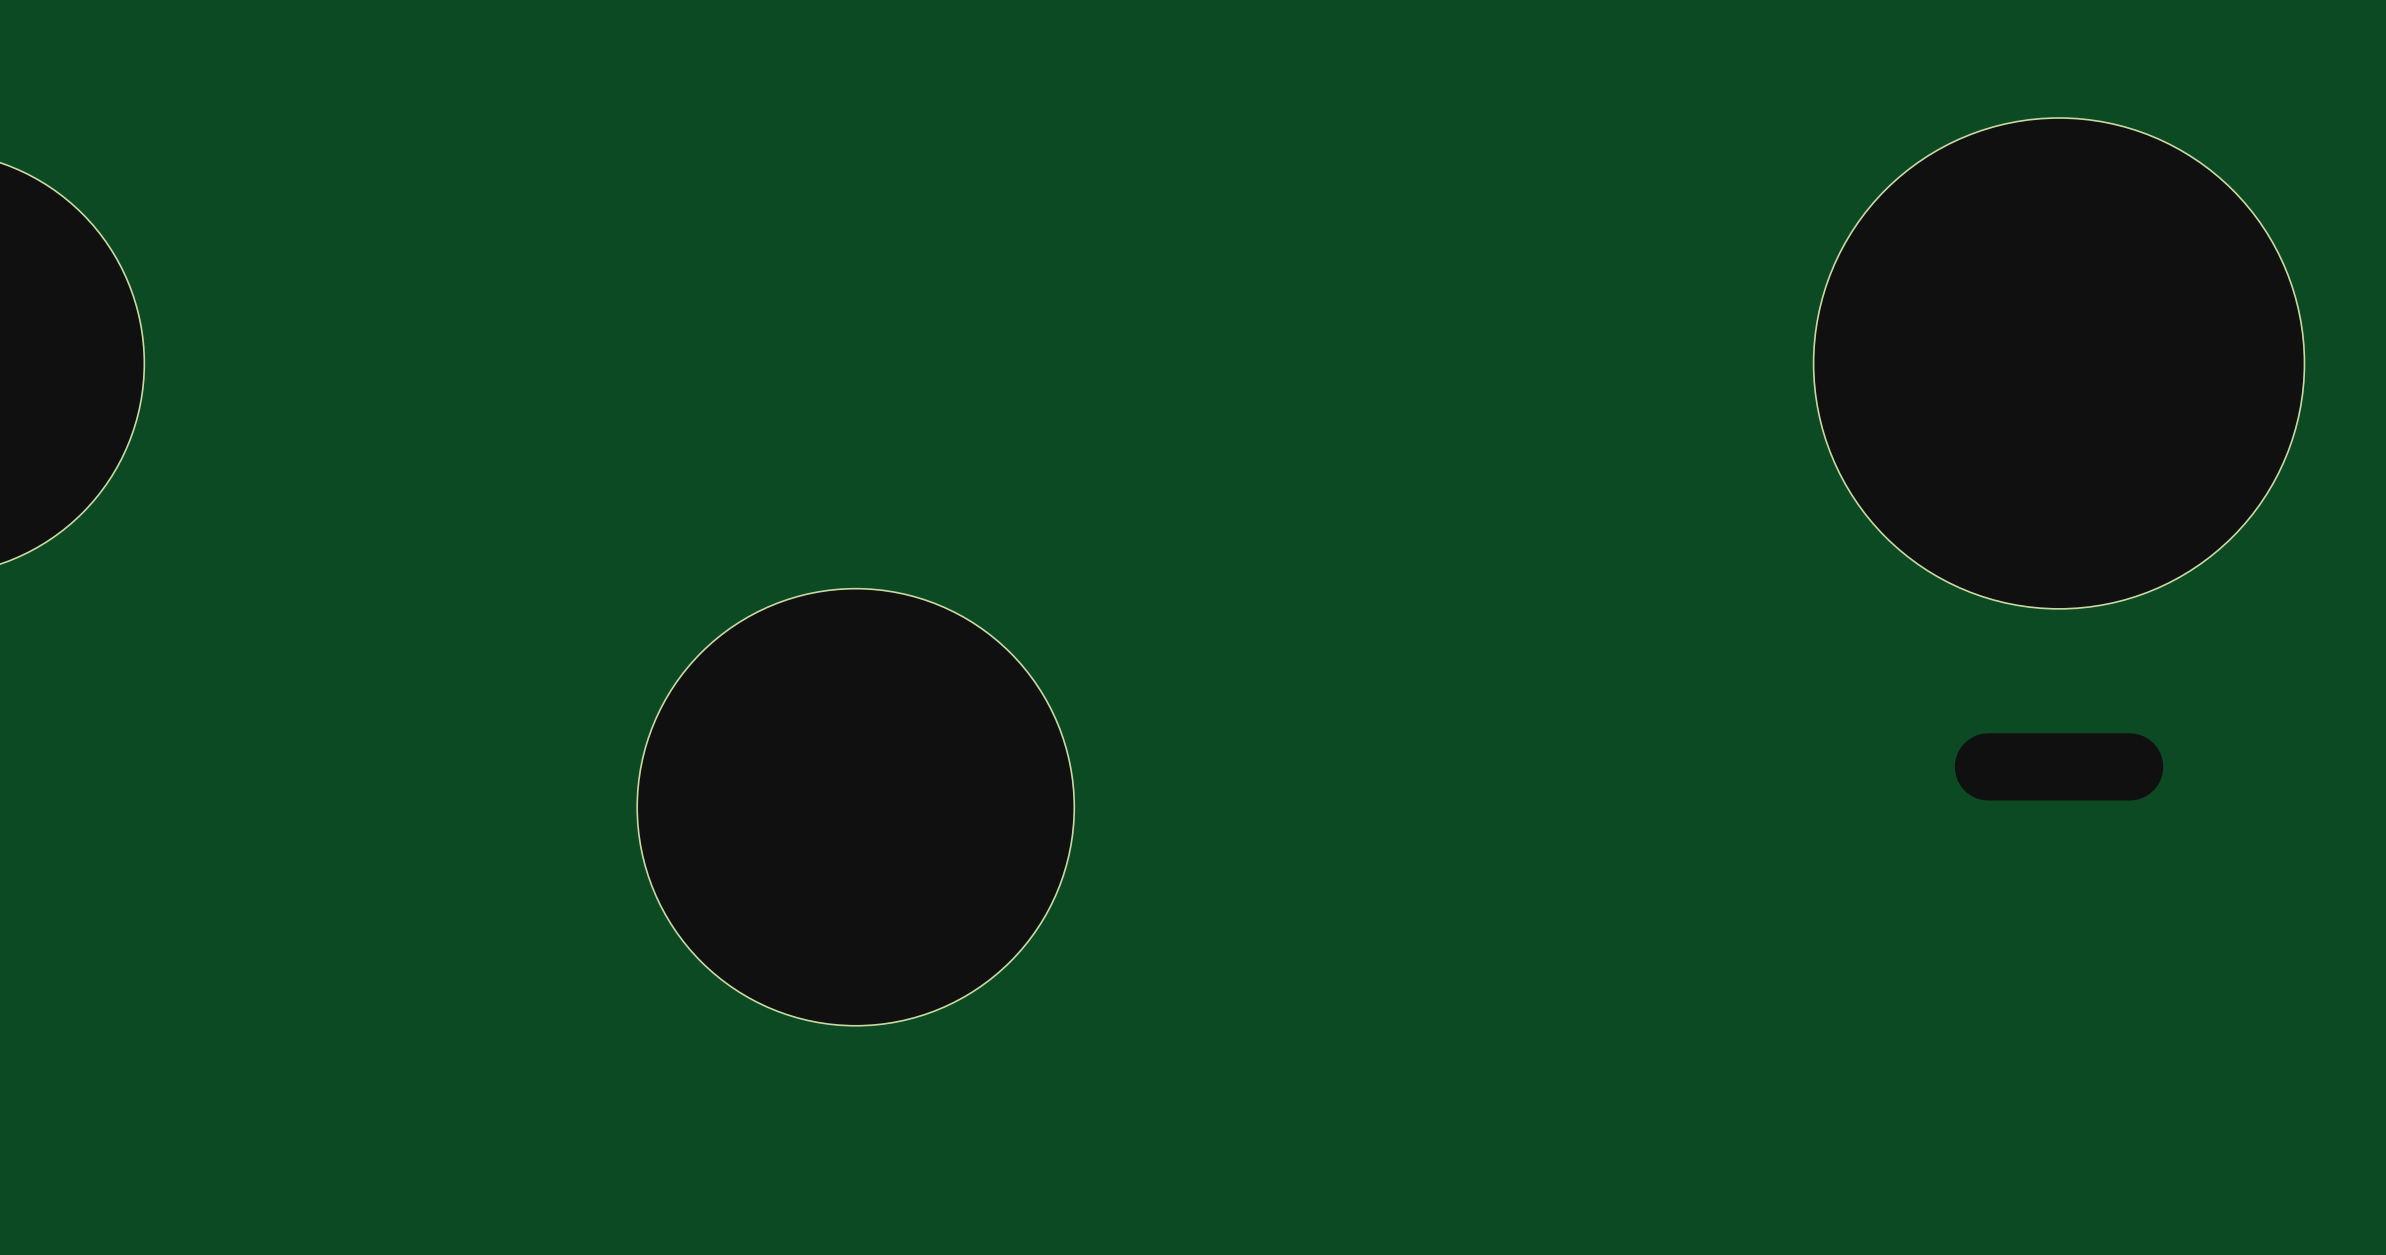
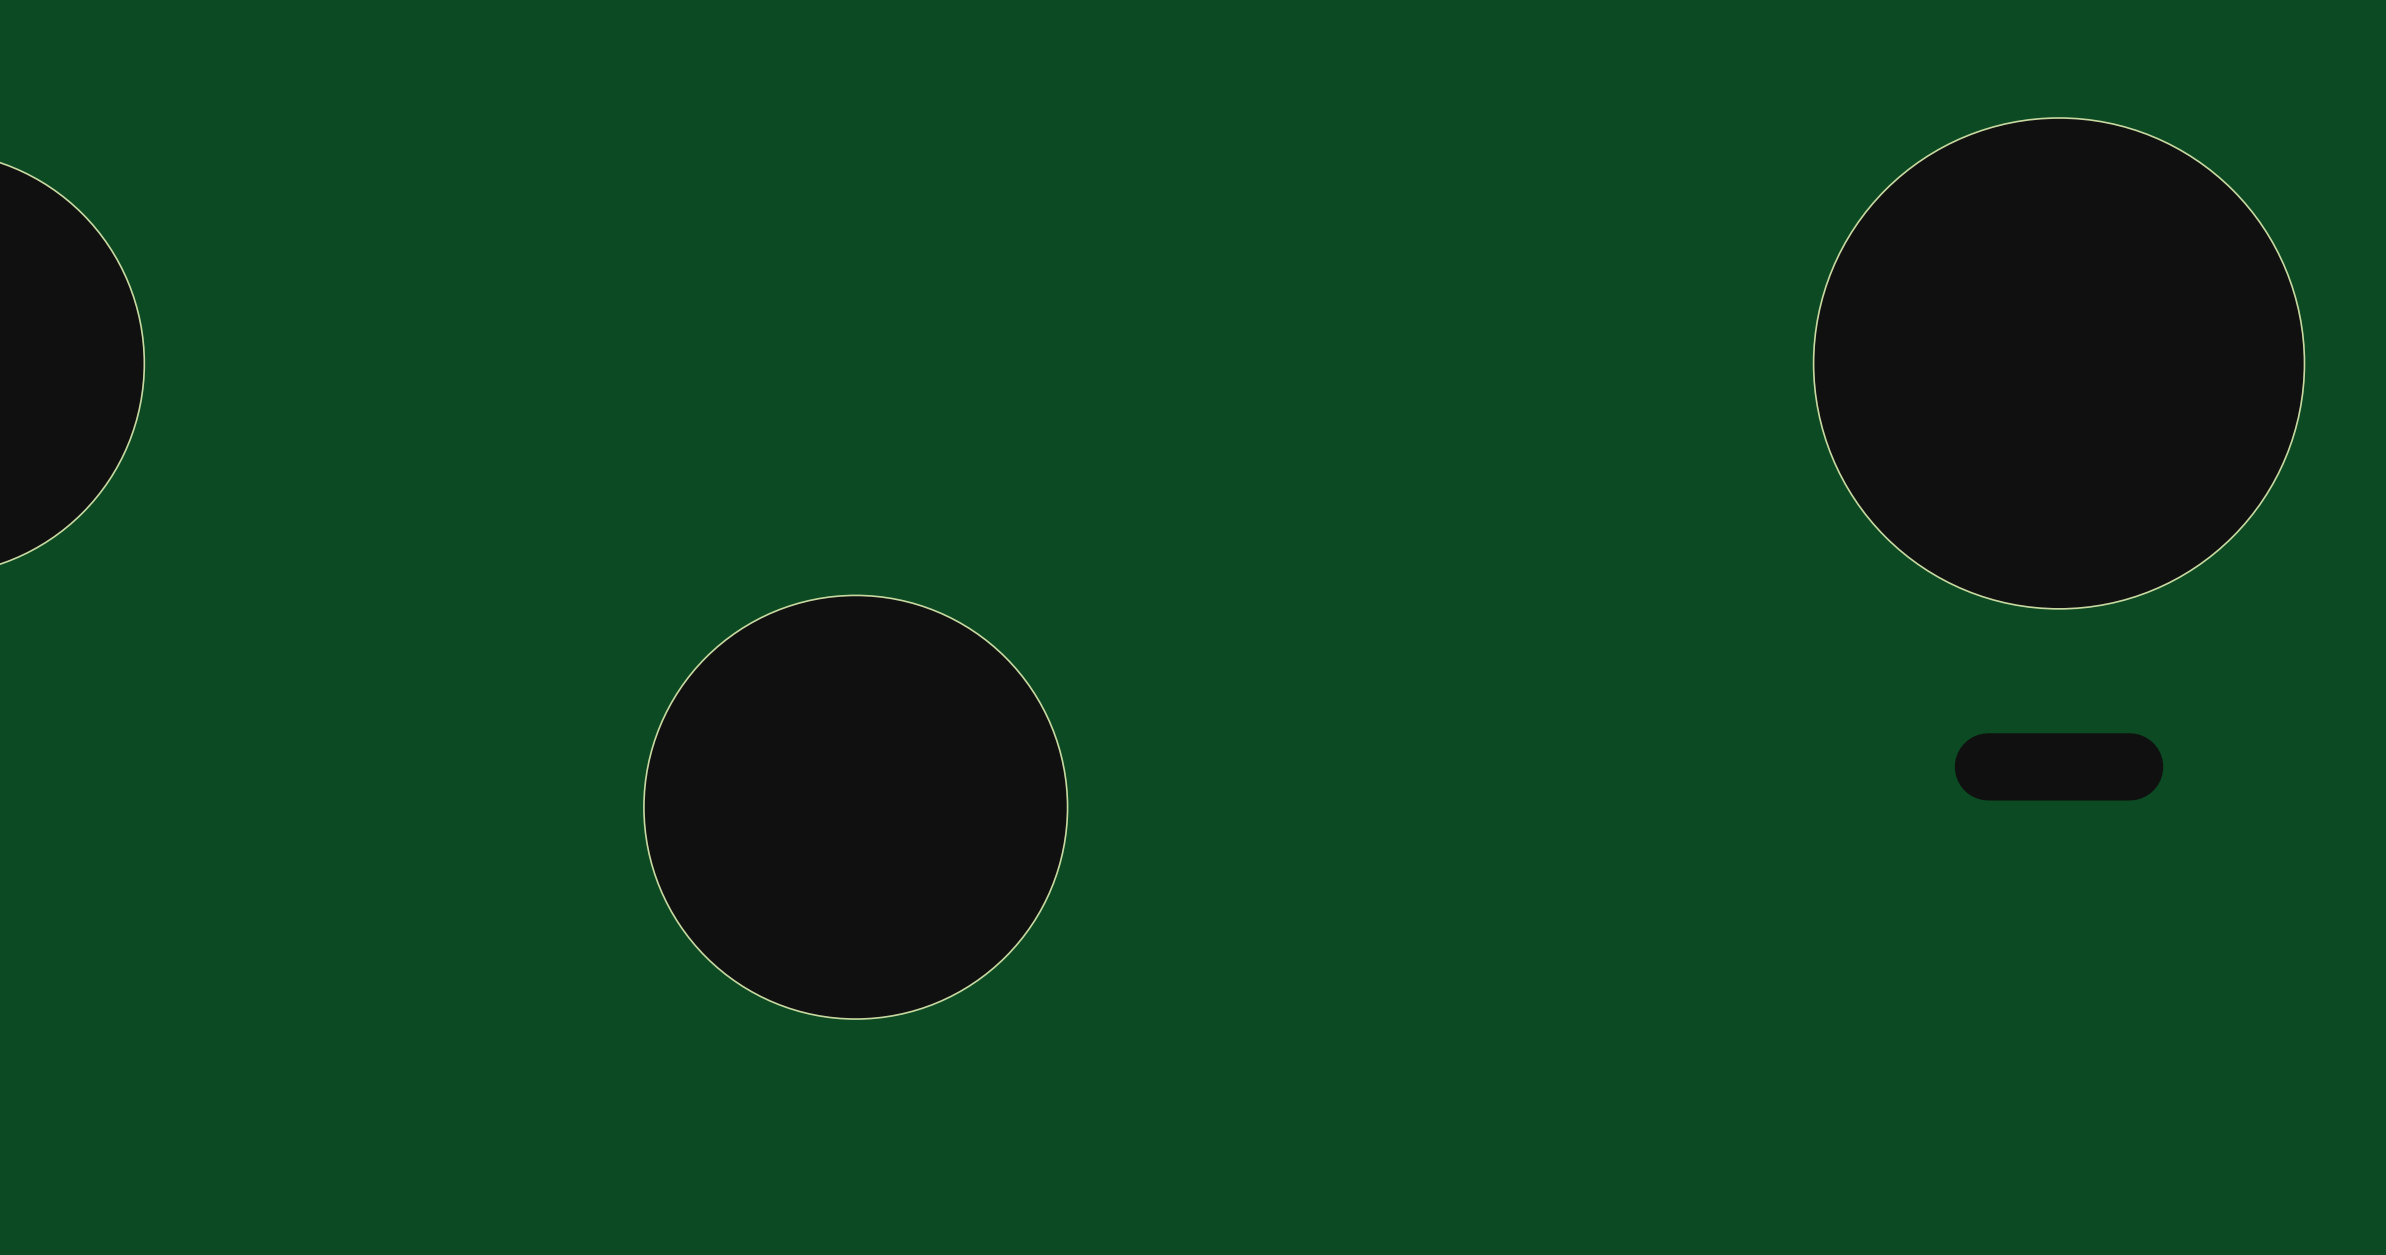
part footprint: [637, 588, 1075, 1026] -> [643, 595, 1068, 1020]

